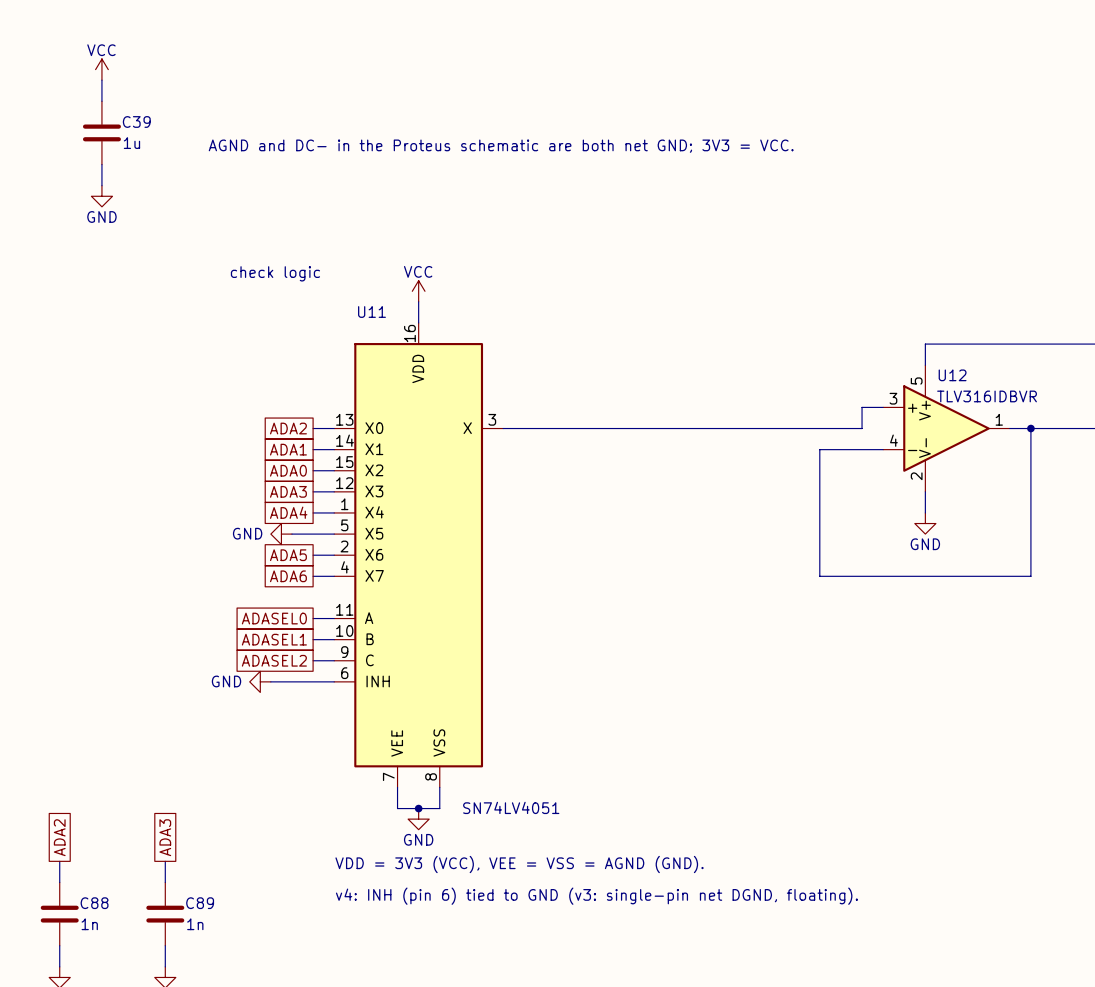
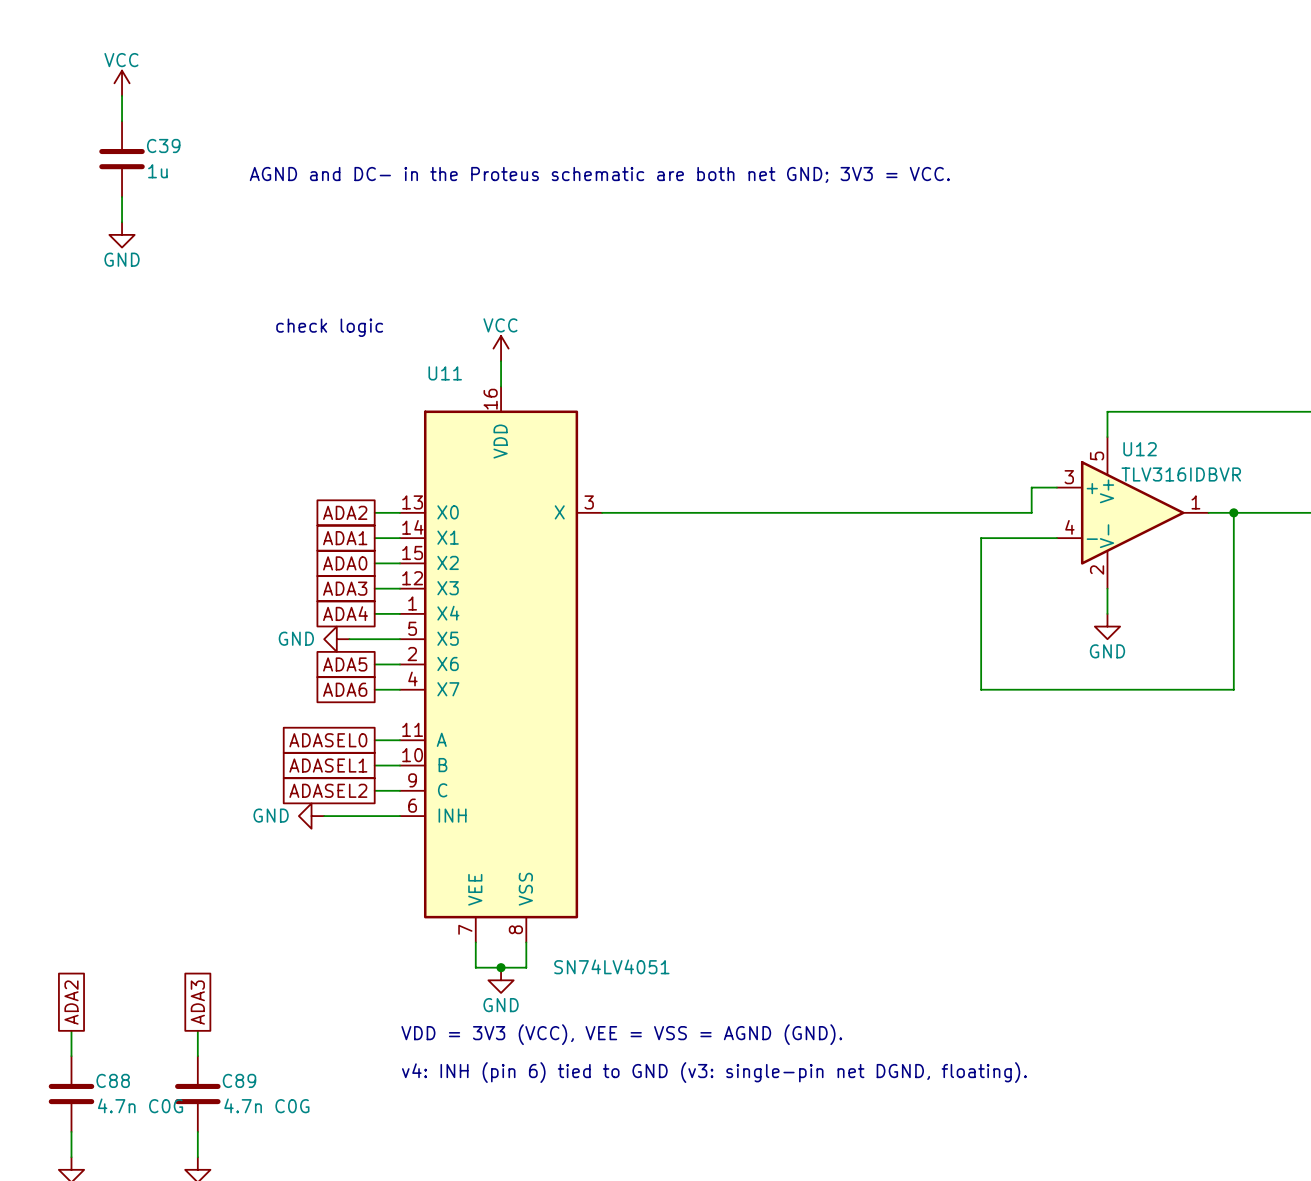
C88 value: 1n (89, 924) -> 4.7n C0G (140, 1105)
C89 value: 1n (195, 924) -> 4.7n C0G (266, 1105)

